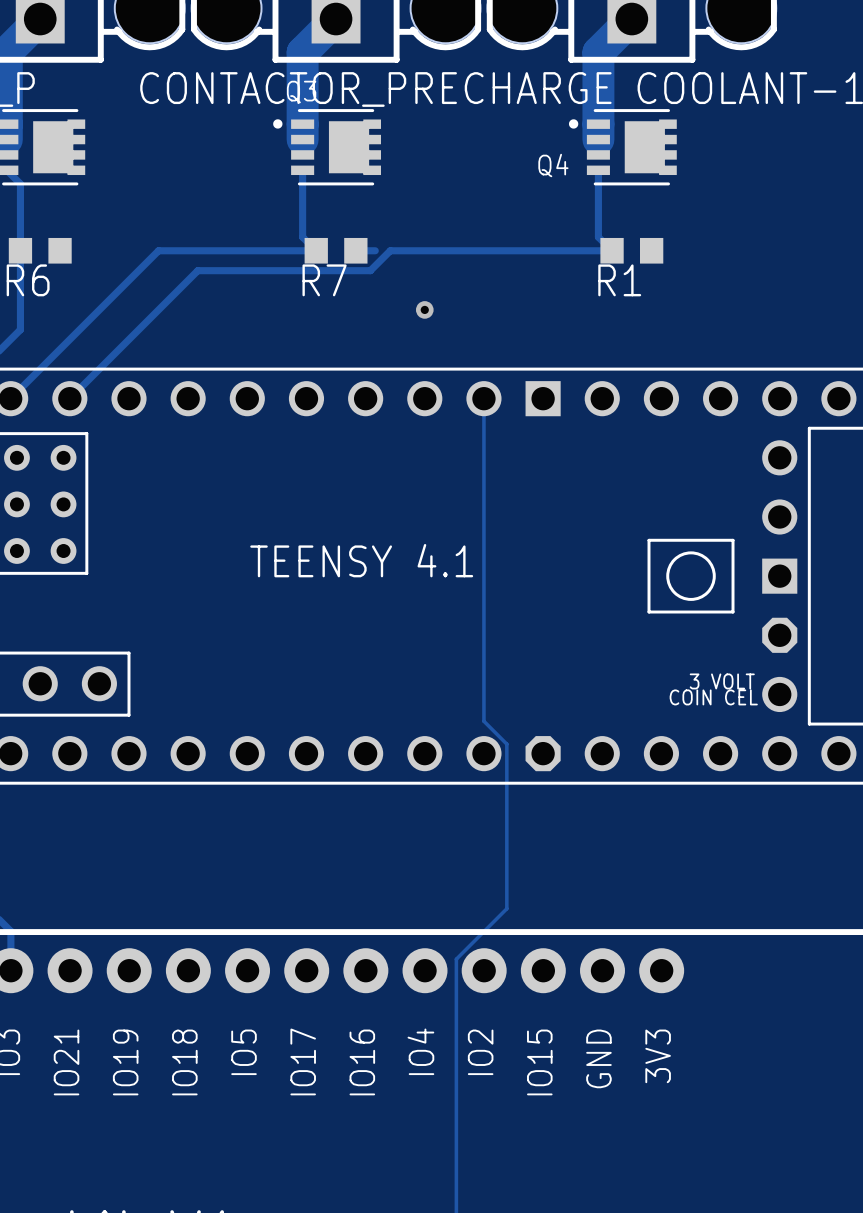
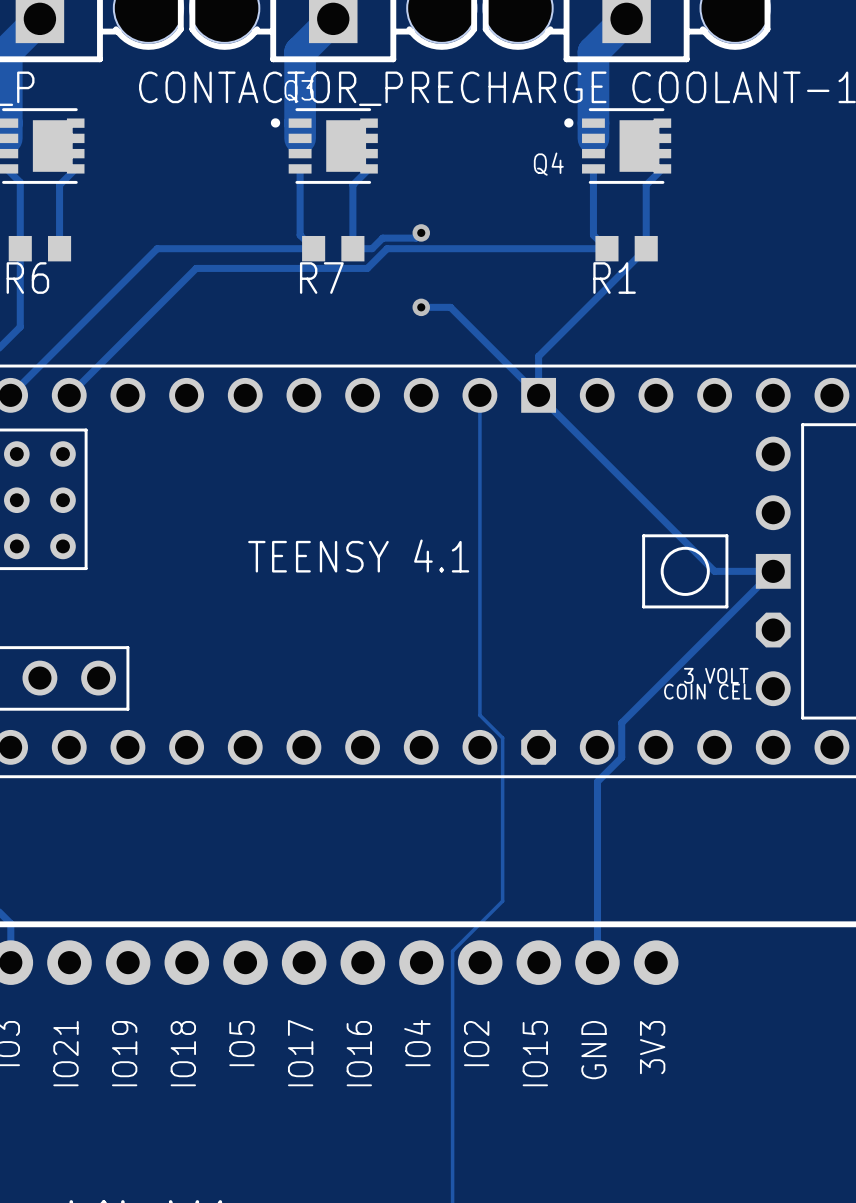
track: none -> (75, 168) (59, 185) (59, 248)
track: none -> (369, 168) (352, 185) (352, 248)
track: none -> (662, 168) (646, 185) (646, 248) (538, 356) (538, 395)
track: none -> (421, 232) (416, 238) (382, 238) (372, 248)
via: none -> (421, 232)
track: none -> (421, 307) (450, 307) (714, 571) (773, 571) (621, 722) (621, 757) (597, 781) (597, 962)

